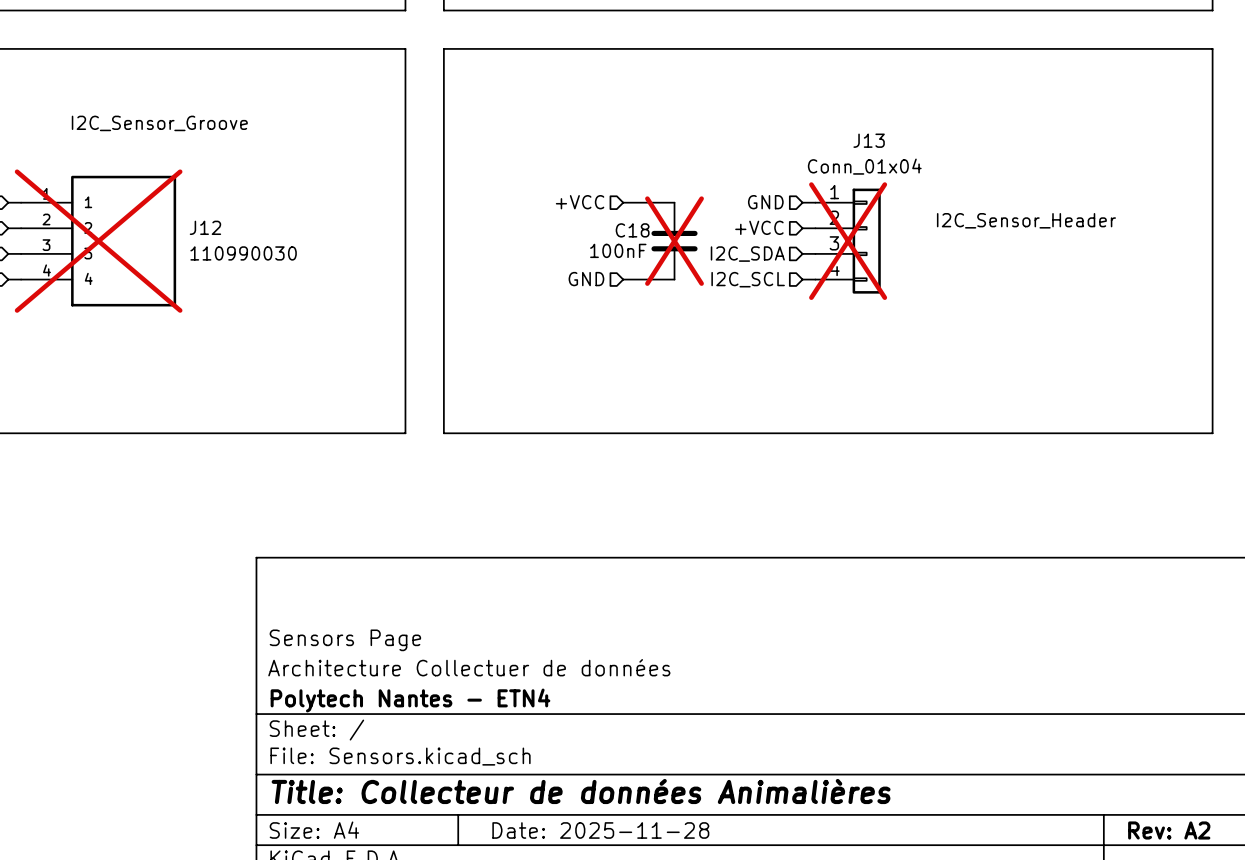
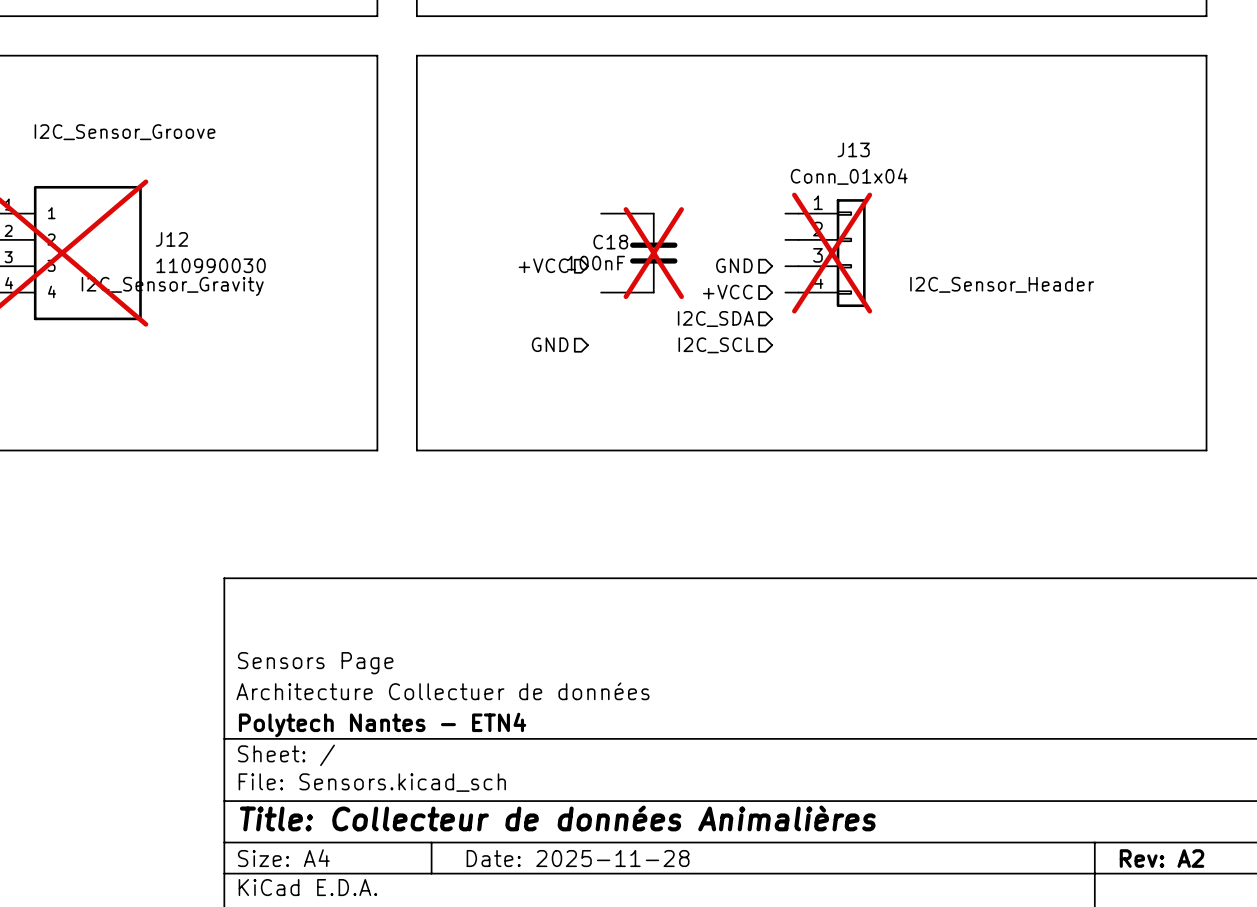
hierarchical label position: +VCC (580, 202) -> +VCC (543, 265)
hierarchical label position: GND (765, 202) -> GND (734, 265)
text position: I2C_Sensor_Header (1026, 220) -> I2C_Sensor_Header (1002, 284)
hierarchical label position: +VCC (759, 227) -> +VCC (727, 292)
hierarchical label position: I2C_SDA (747, 254) -> I2C_SDA (715, 319)
text: none -> I2C_Sensor_Gravity (172, 286)
hierarchical label position: GND (586, 279) -> GND (550, 344)
hierarchical label position: I2C_SCL (748, 279) -> I2C_SCL (716, 345)

